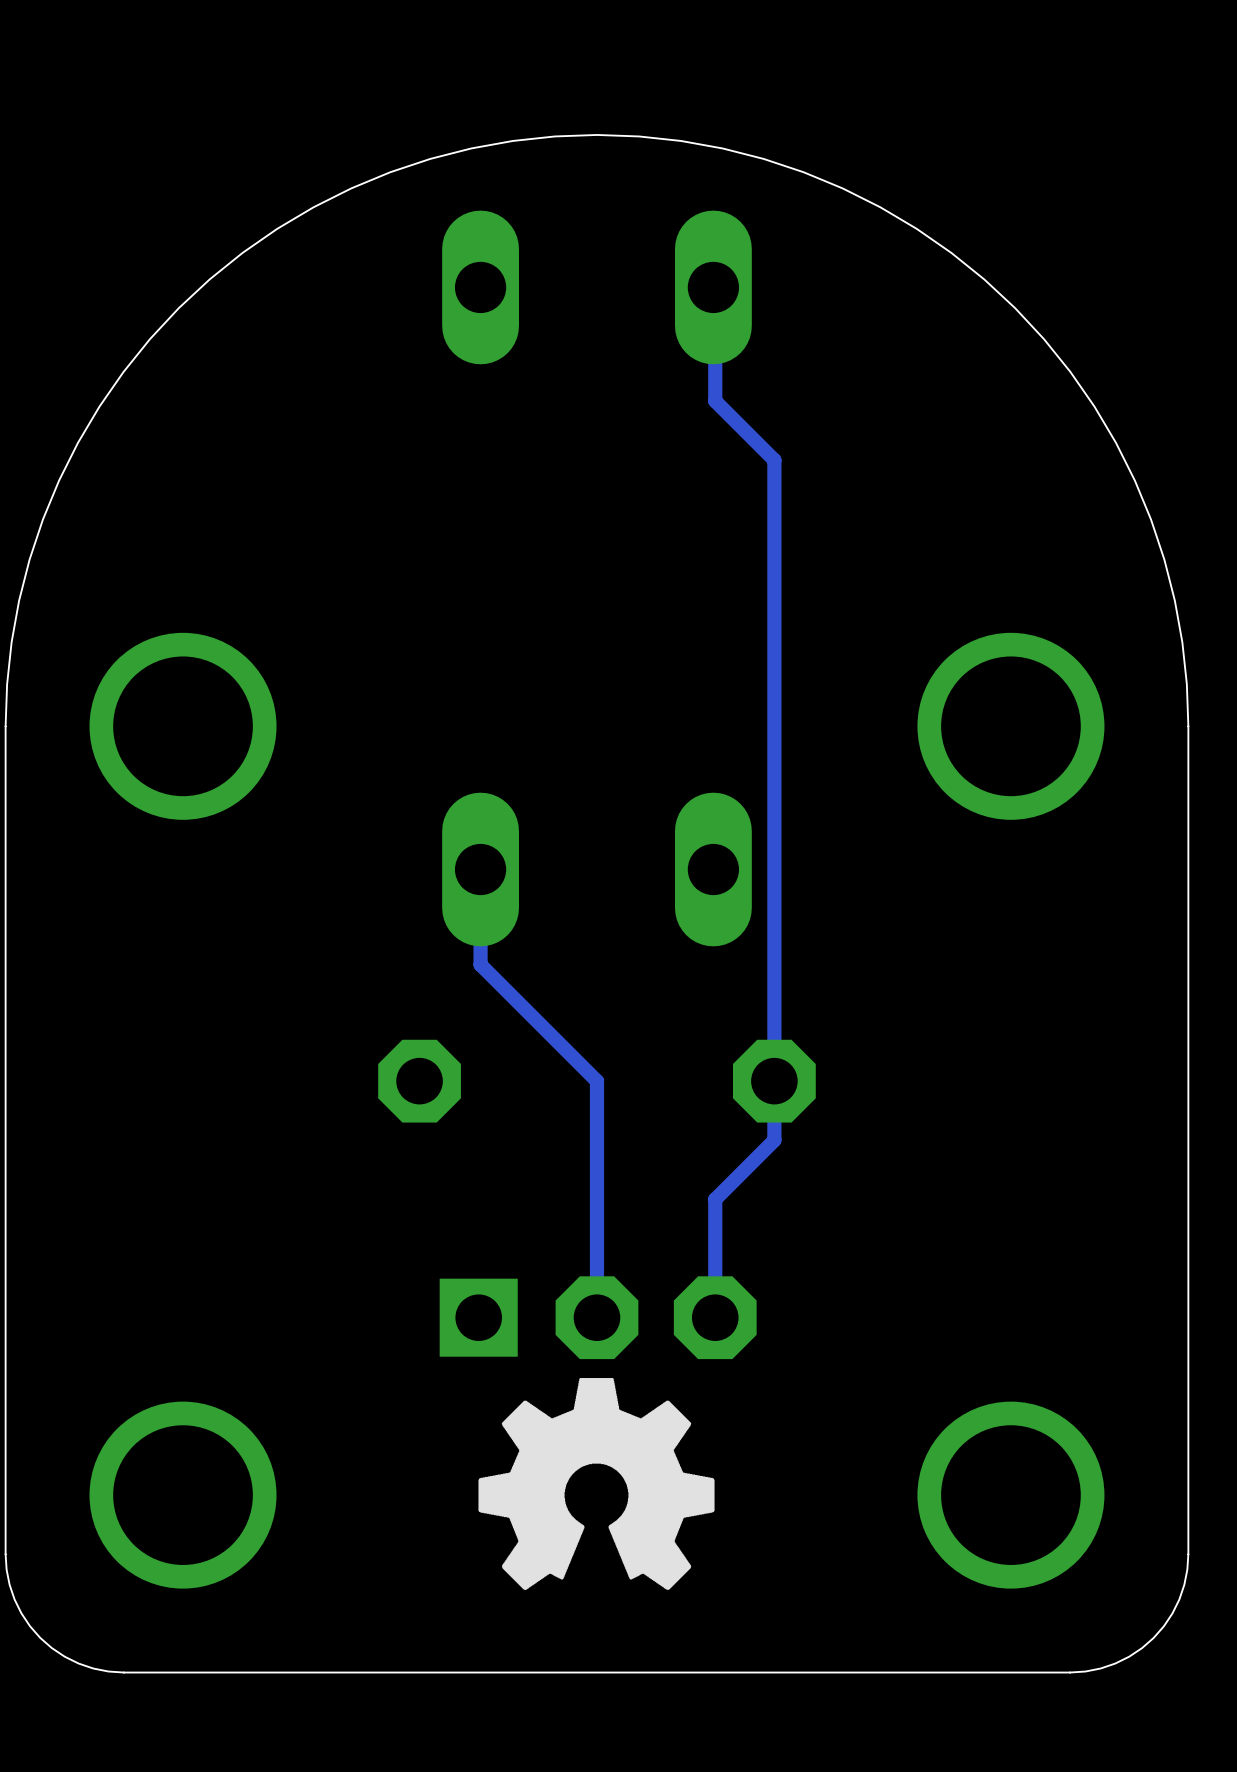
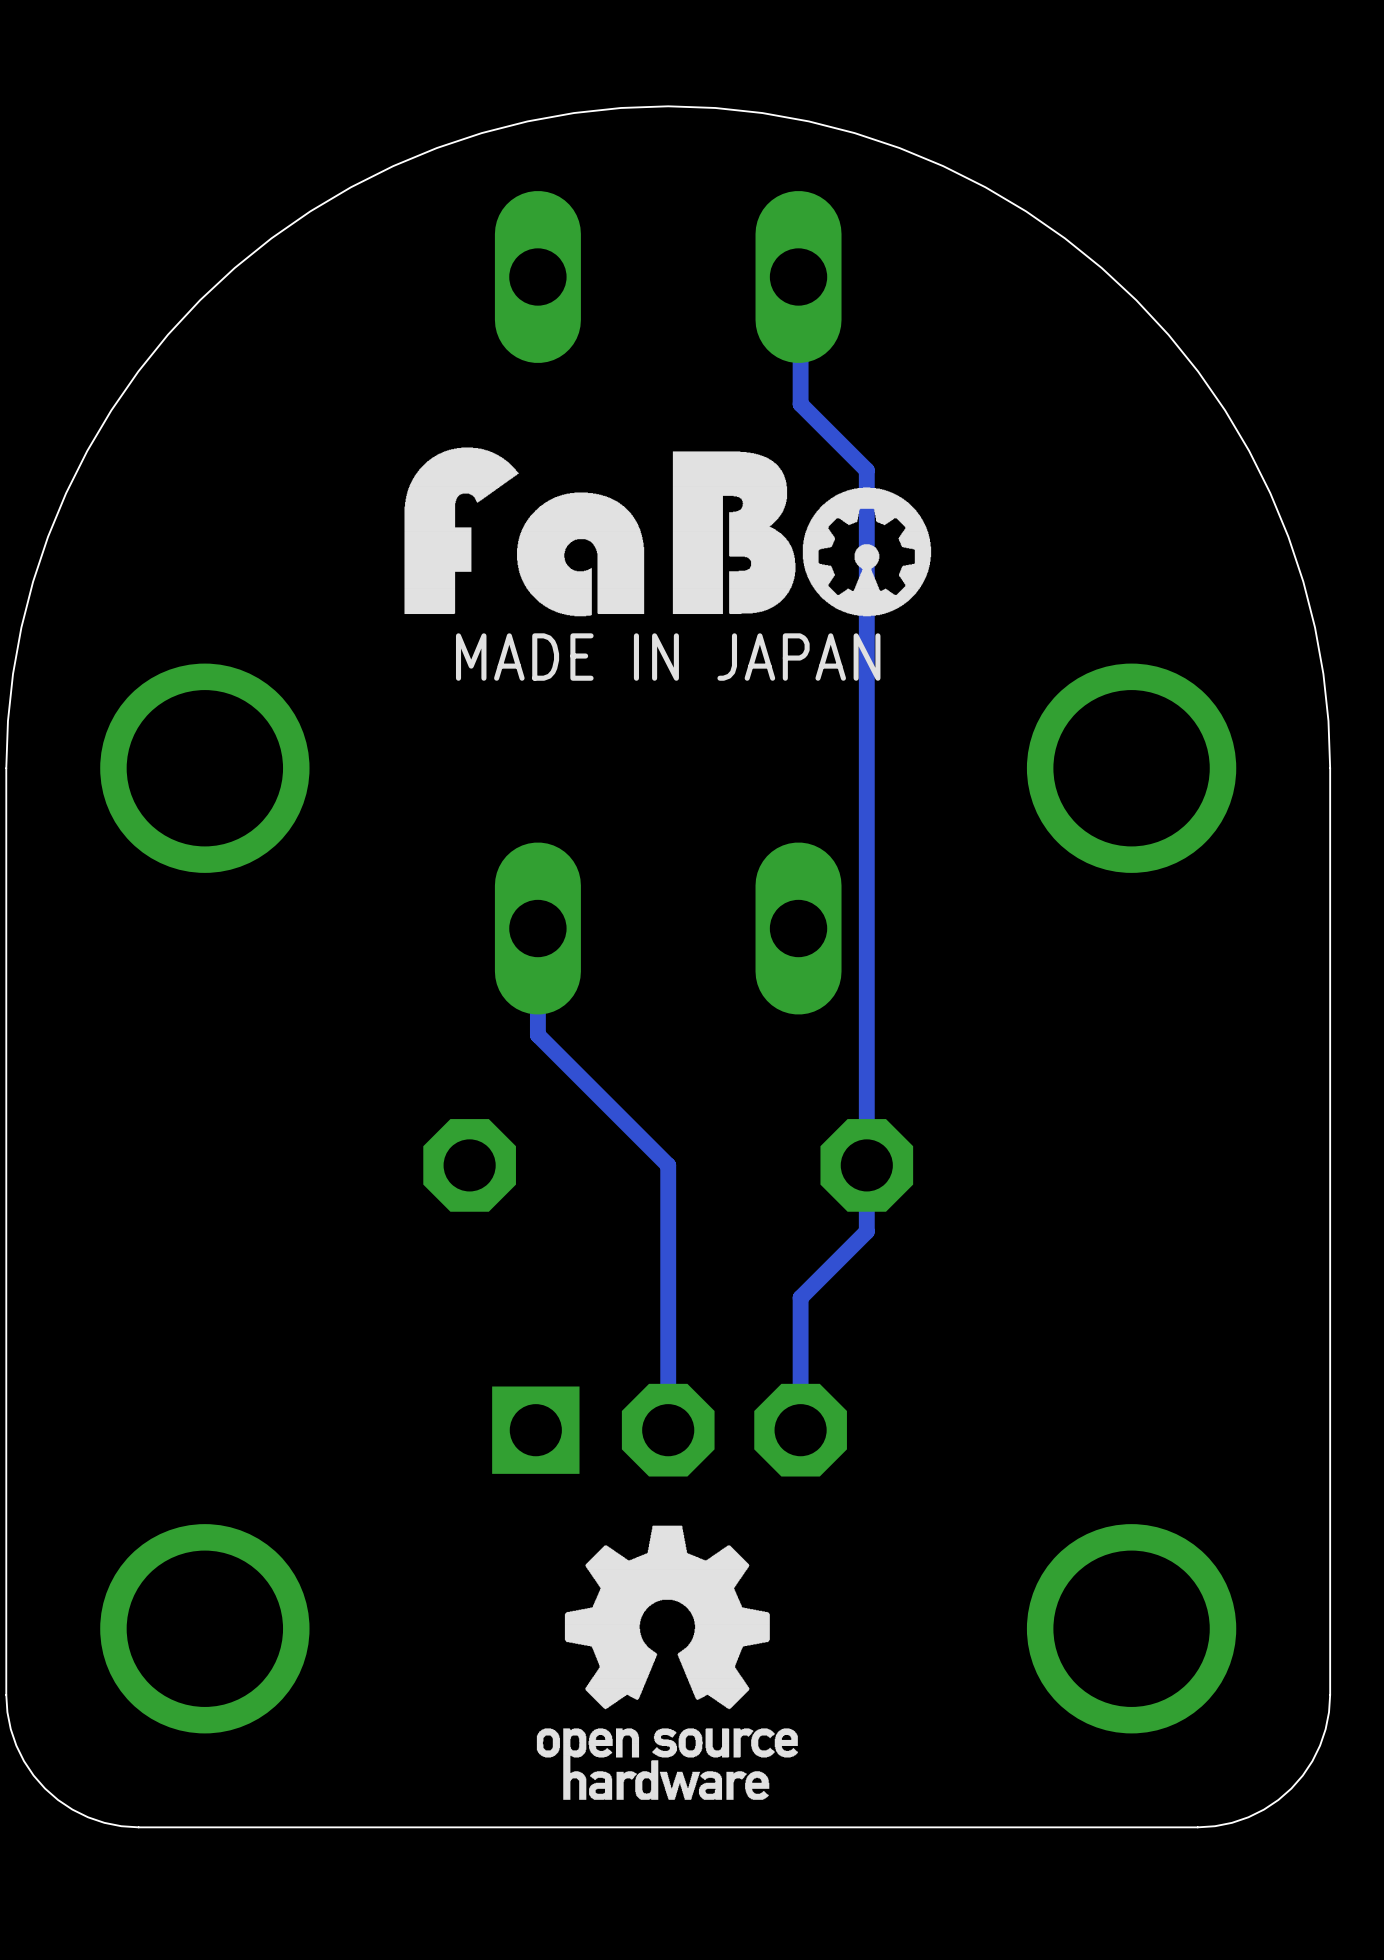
drawing: none -> [404, 447, 932, 617]
text: none -> MADE IN JAPAN (668, 657)
drawing shape: [478, 1378, 715, 1590] -> [536, 1525, 798, 1800]

